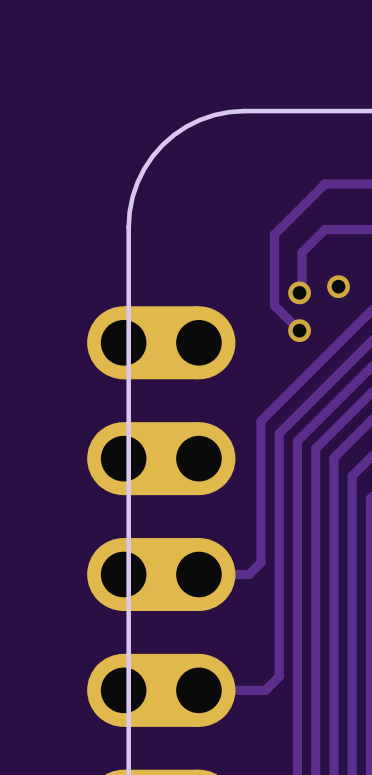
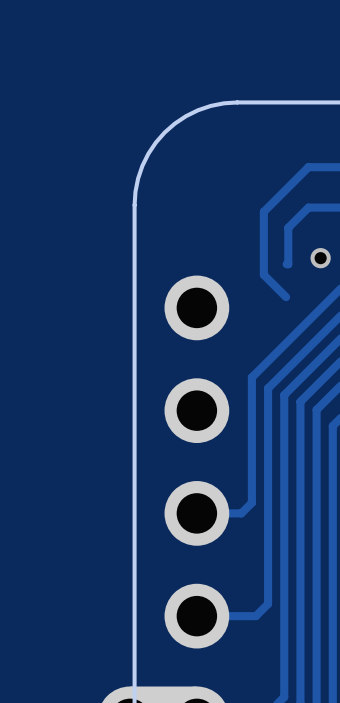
via: (299, 292) -> none
part footprint: [87, 306, 236, 380] -> [164, 275, 230, 341]
via: (299, 330) -> none
part footprint: [87, 422, 236, 496] -> [164, 378, 230, 444]
part footprint: [87, 538, 236, 611] -> [164, 481, 230, 546]
part footprint: [87, 653, 236, 727] -> [164, 583, 230, 649]

